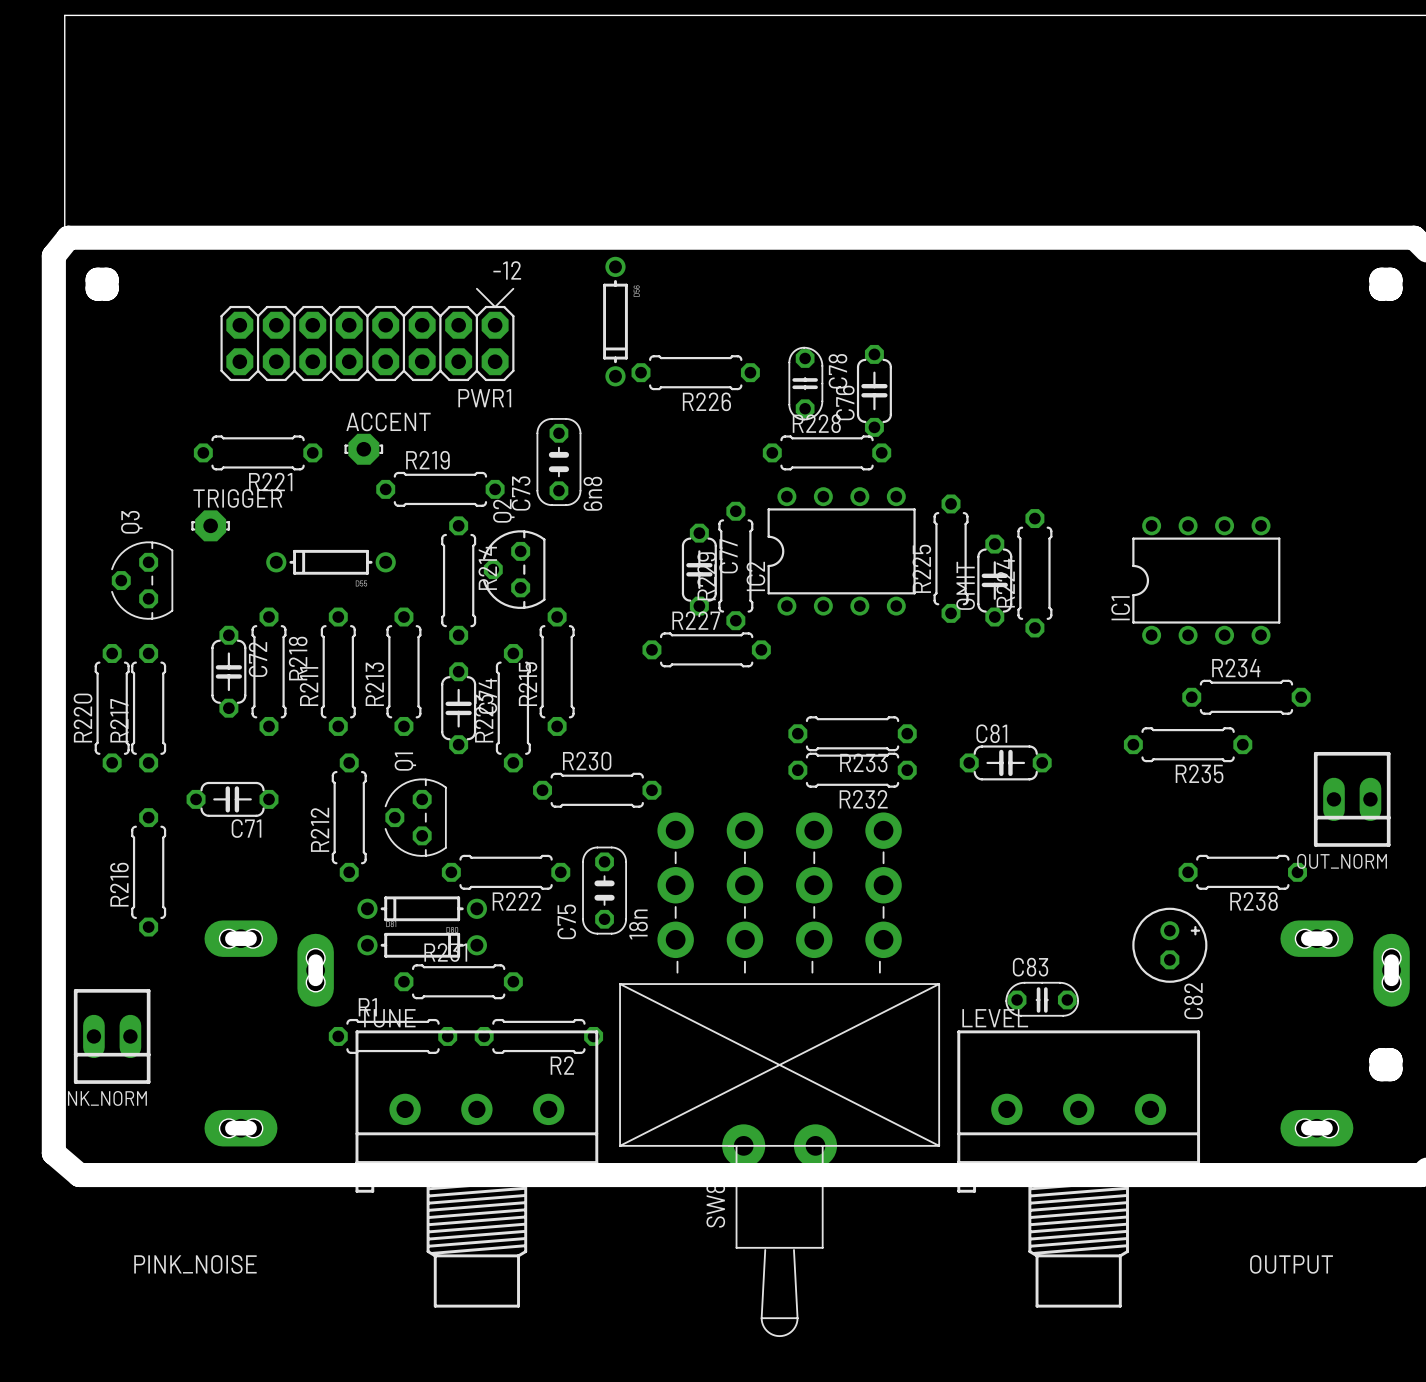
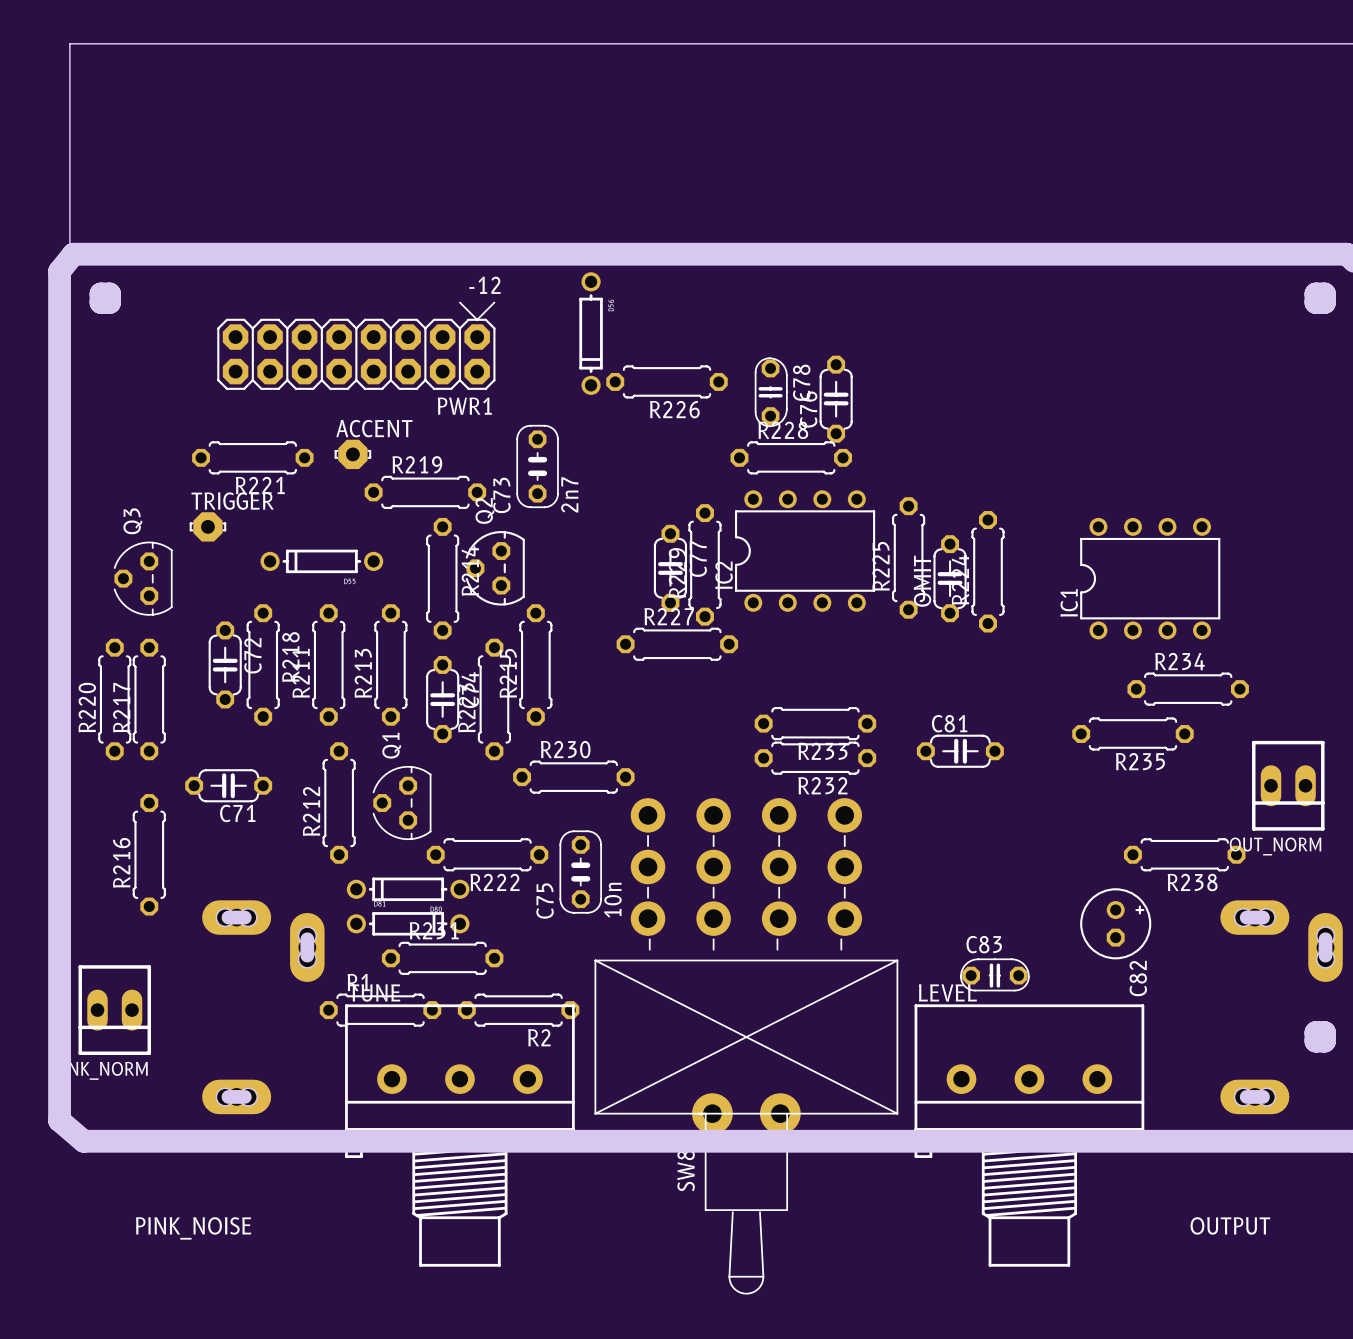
C73 value: 6n8 (592, 493) -> 2n7 (569, 494)
C75 value: 18n (638, 924) -> 10n (612, 900)

